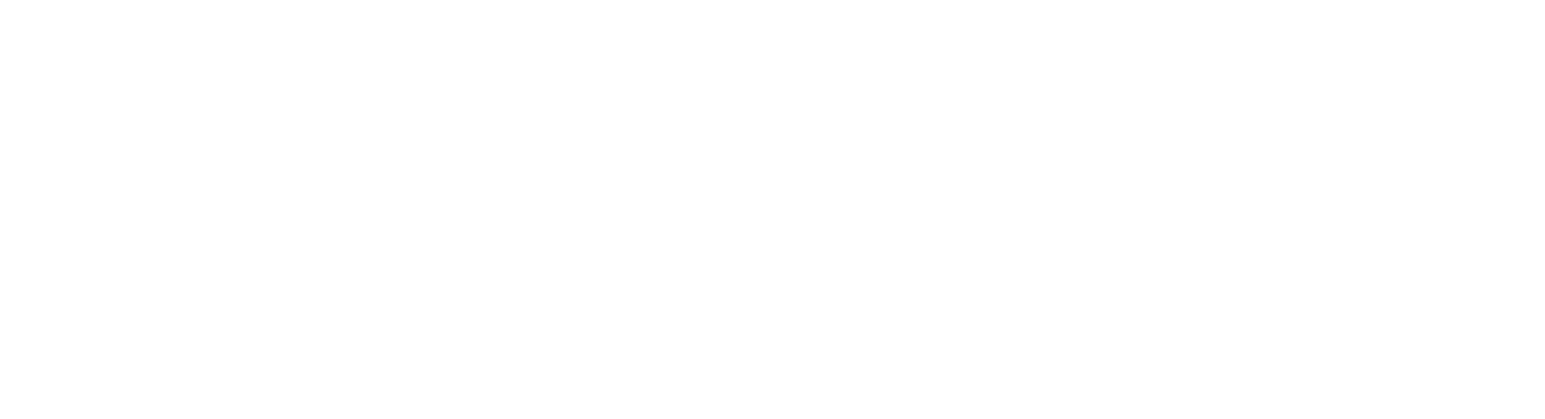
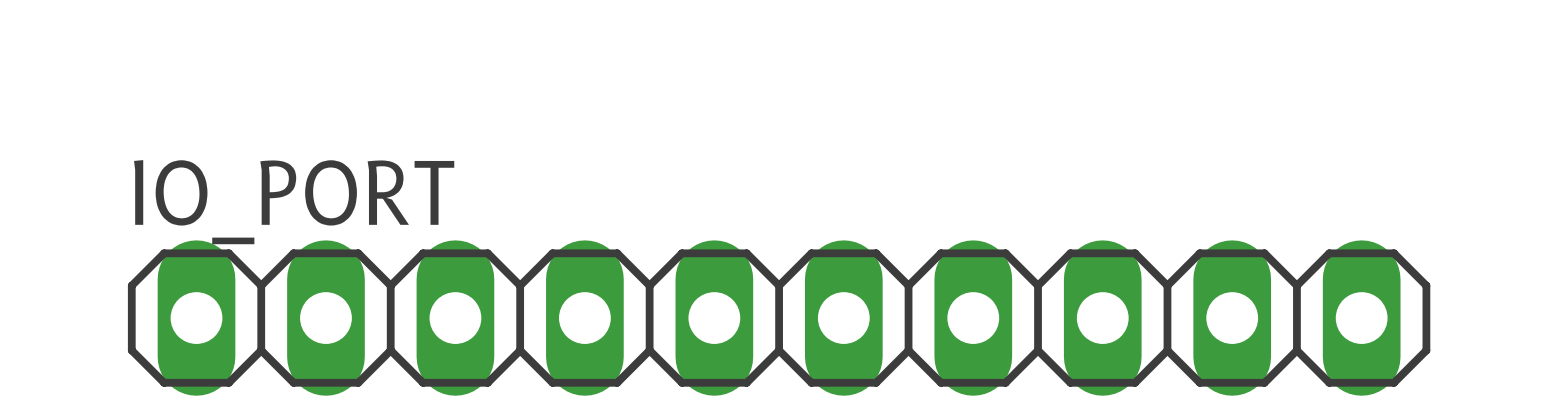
IO_PORT: none -> (779, 318)

